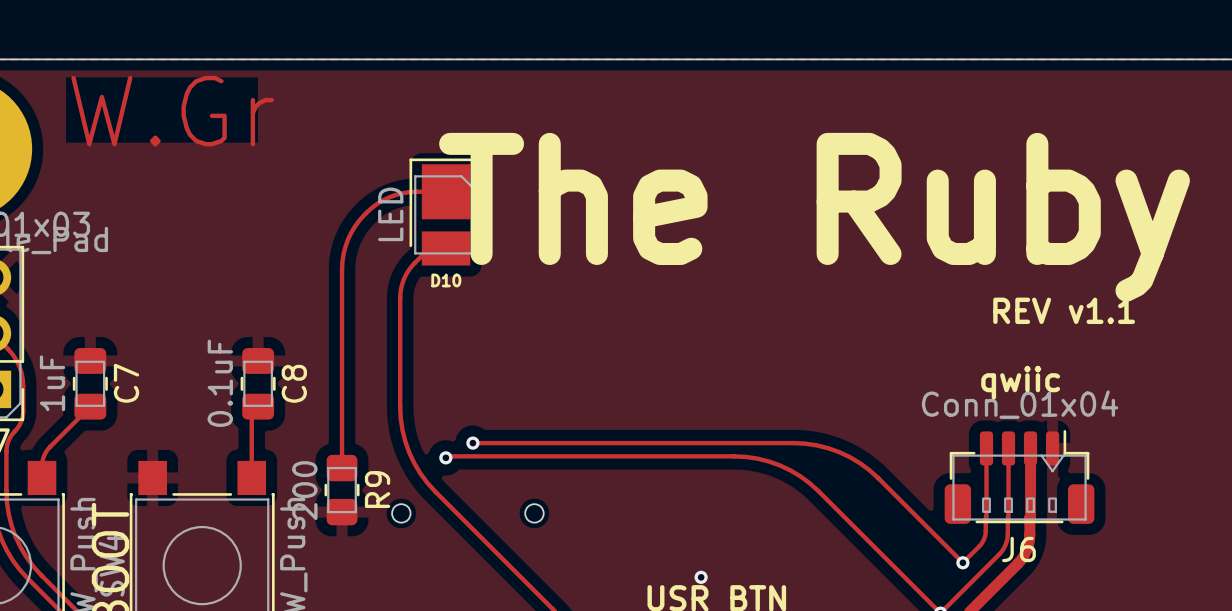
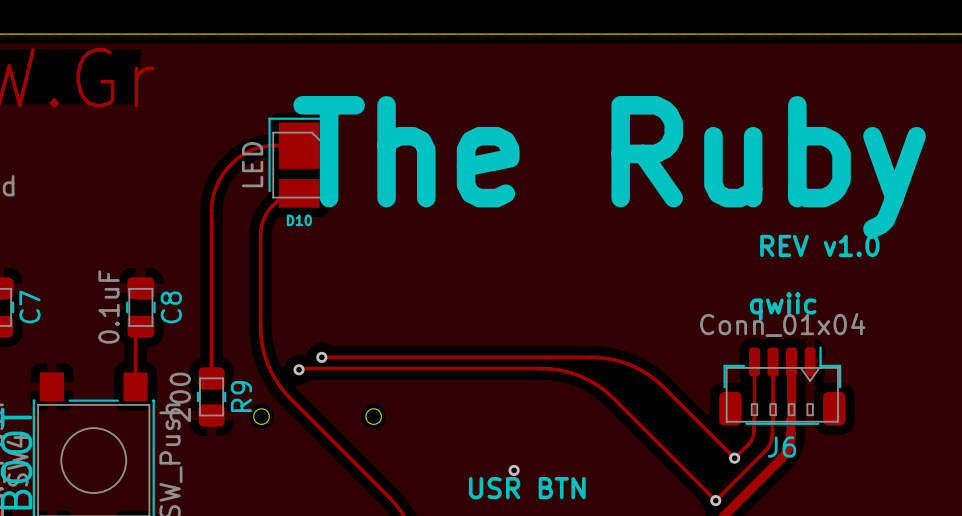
text: REV v1.1 (1064, 310) -> REV v1.0 (819, 245)

